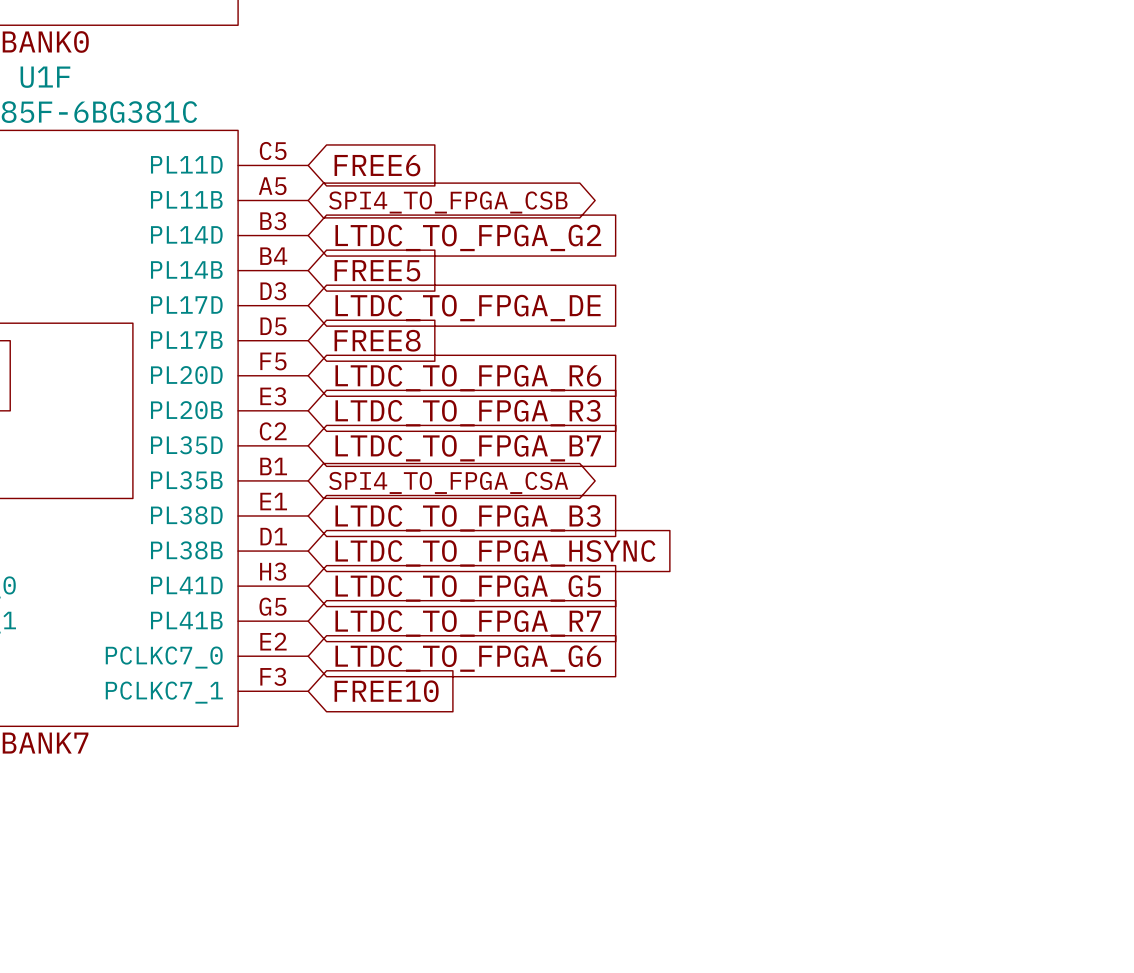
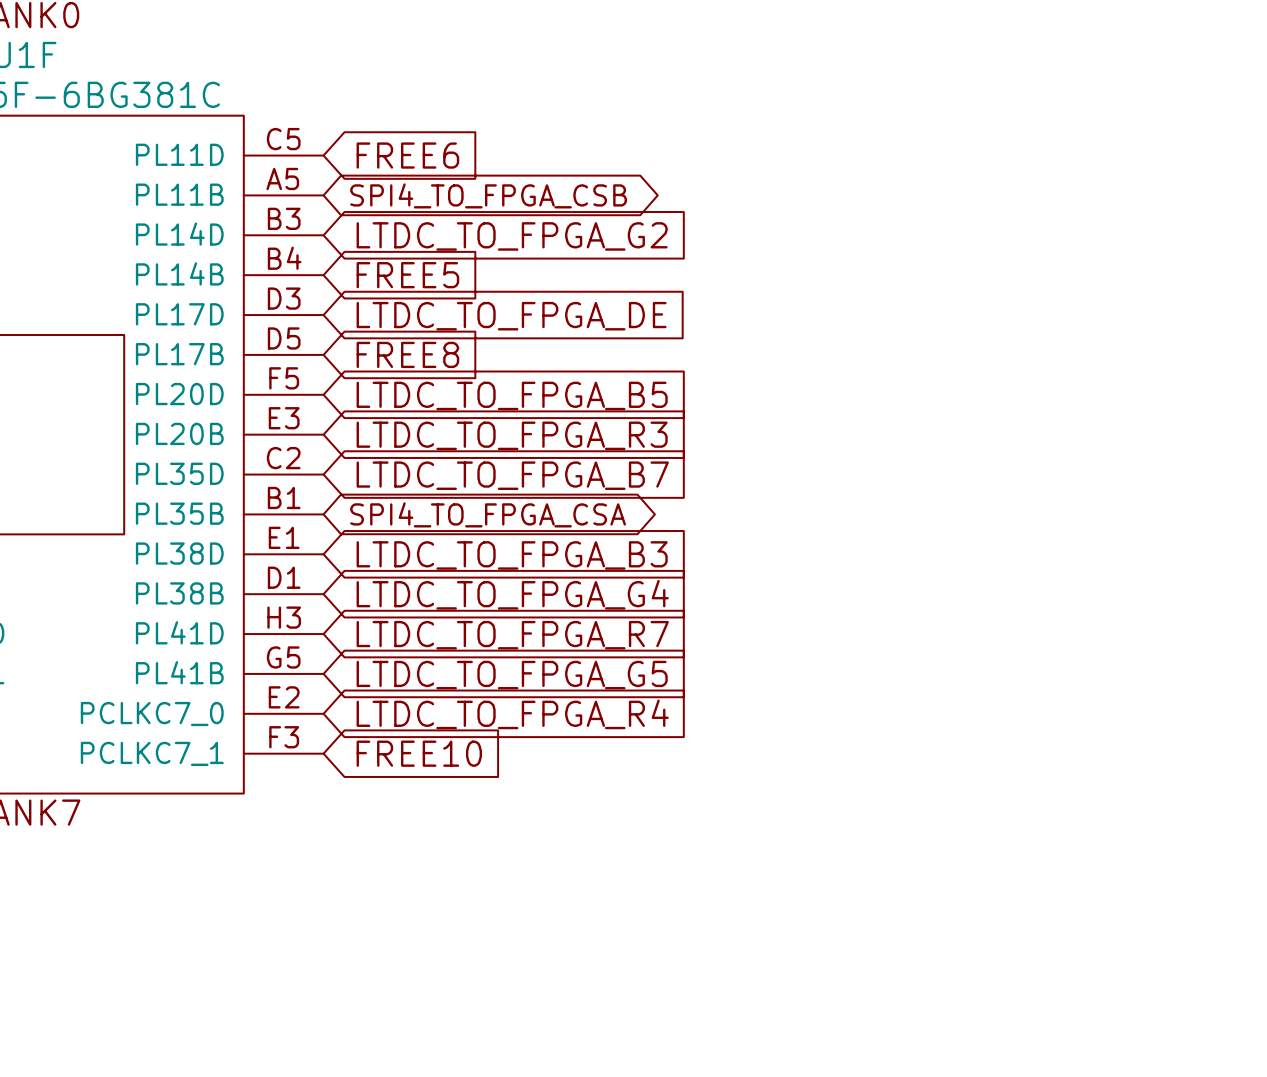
global label: LTDC_TO_FPGA_R6 (468, 378) -> LTDC_TO_FPGA_B5 (512, 395)
global label: LTDC_TO_FPGA_HSYNC (495, 553) -> LTDC_TO_FPGA_G4 (512, 594)
global label: LTDC_TO_FPGA_G5 (468, 588) -> LTDC_TO_FPGA_R7 (512, 635)
global label: LTDC_TO_FPGA_R7 (468, 623) -> LTDC_TO_FPGA_G5 (512, 675)
global label: LTDC_TO_FPGA_G6 (468, 658) -> LTDC_TO_FPGA_R4 (512, 714)

